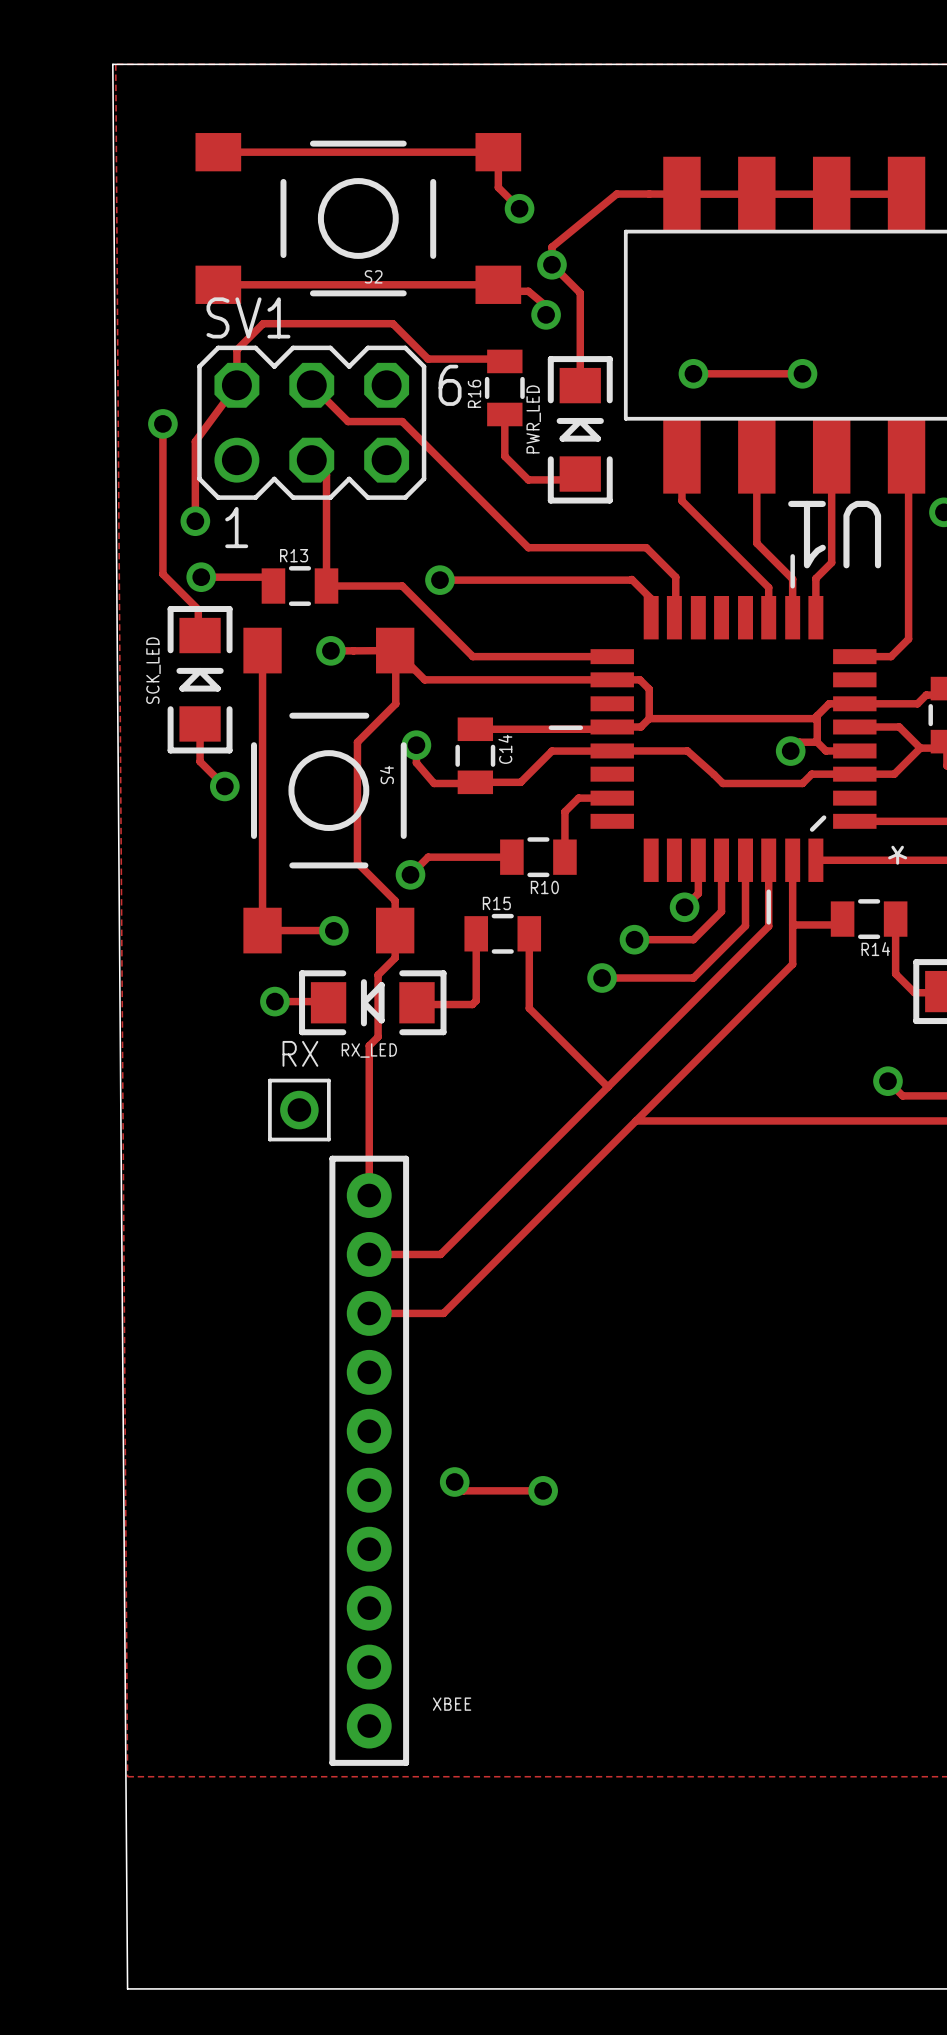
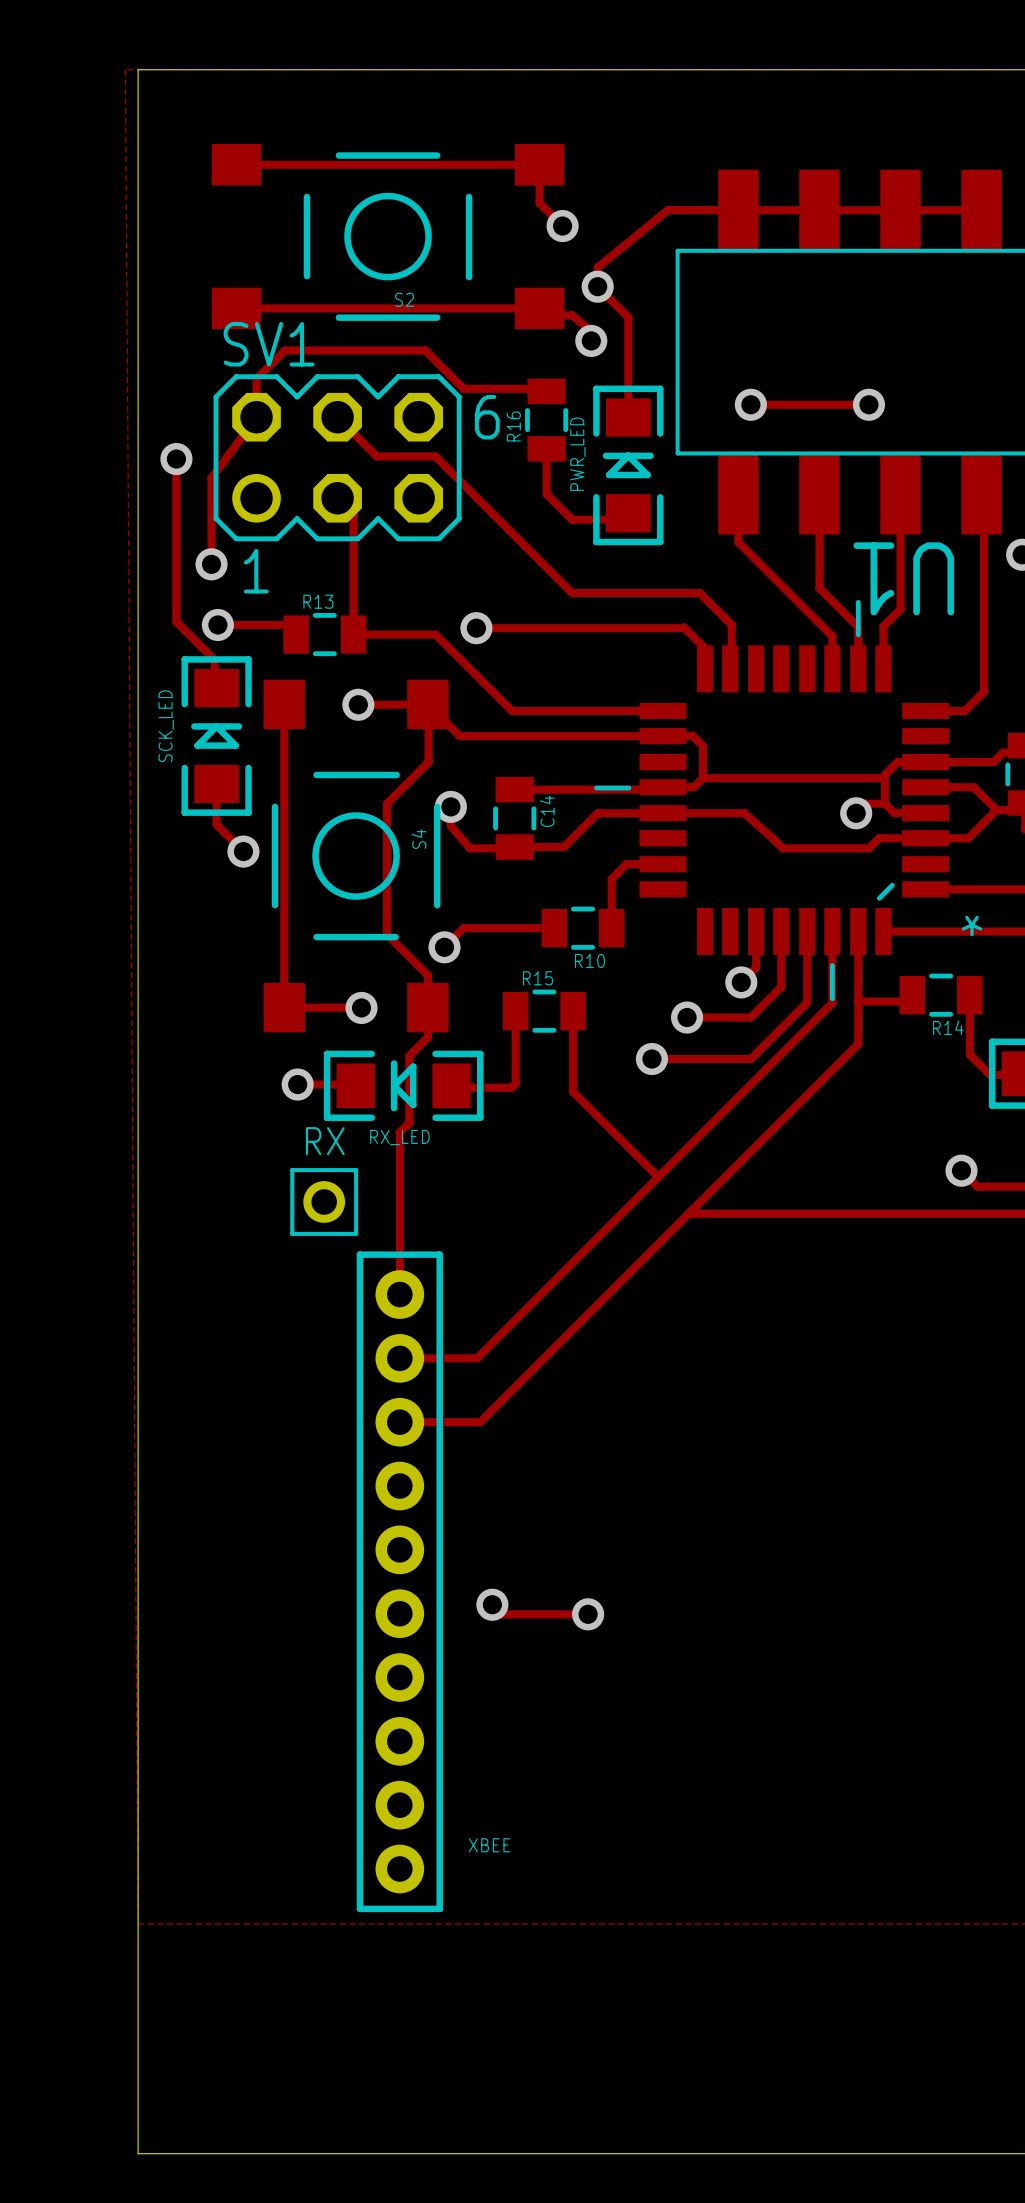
board edge: (127, 64) (112, 64) (127, 1988) -> (138, 69) (138, 2153)

